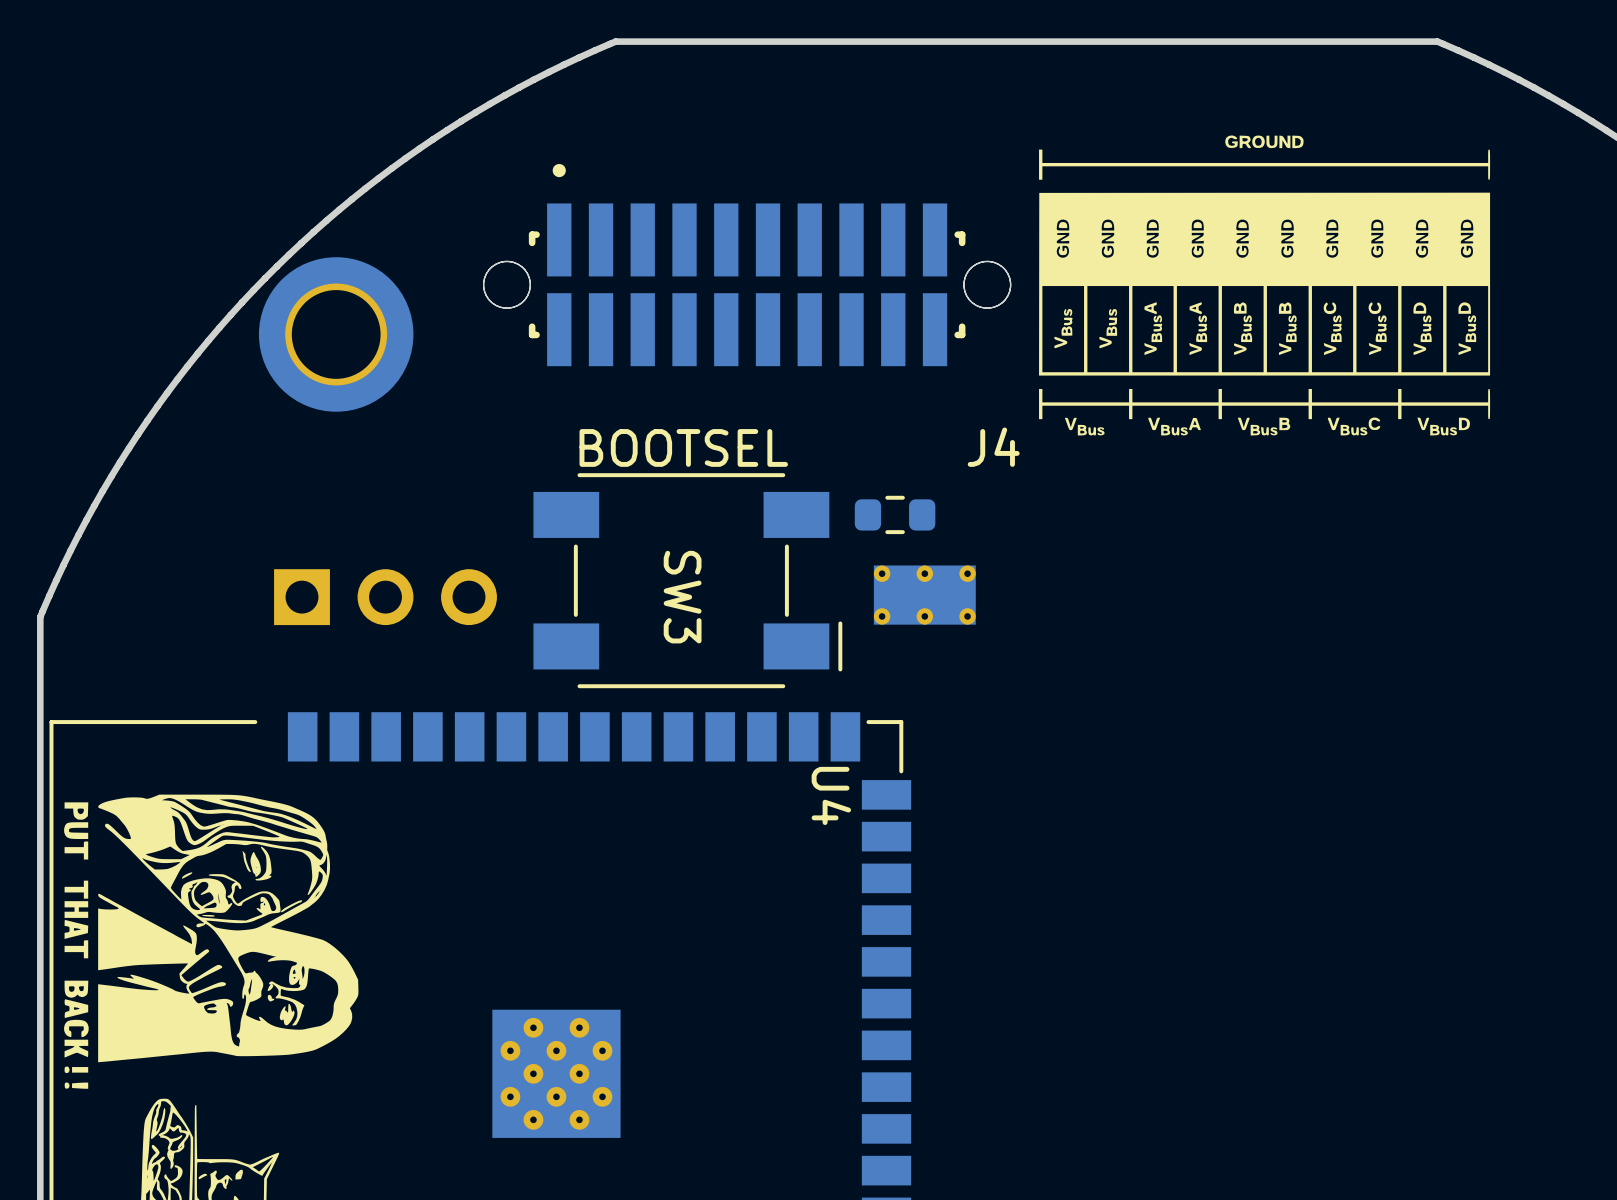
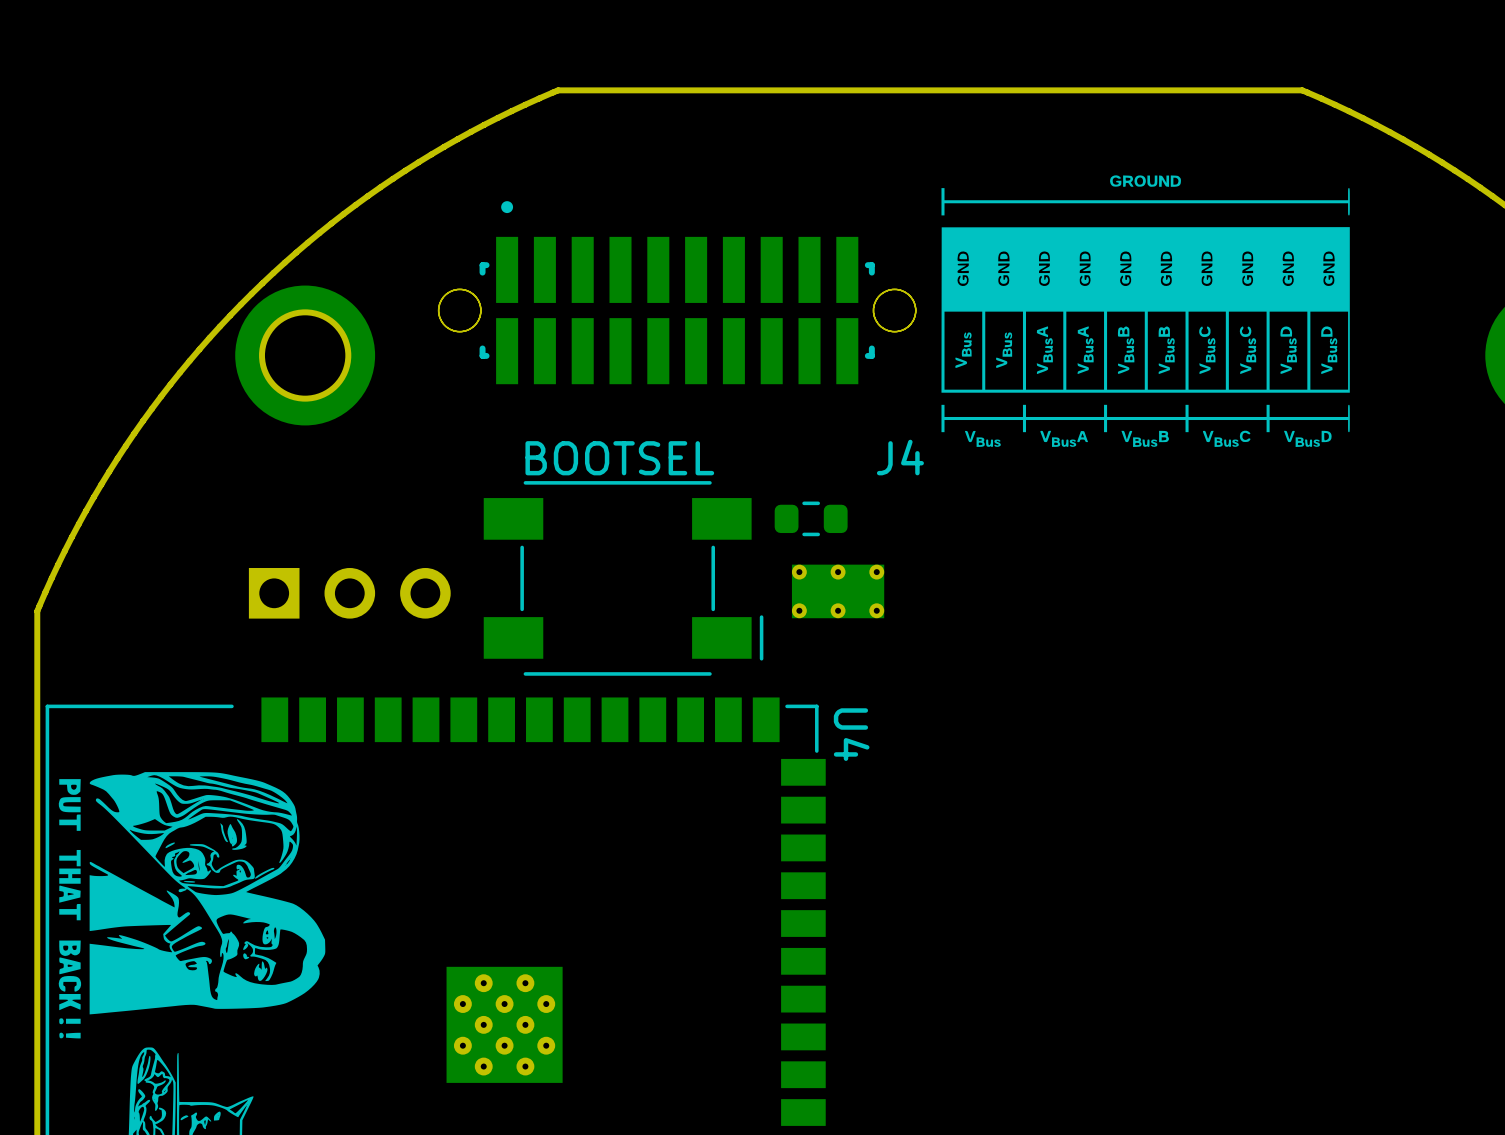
SW3 name: SW3 (682, 597) -> none
U4 name position: U4 (831, 795) -> U4 (851, 734)

